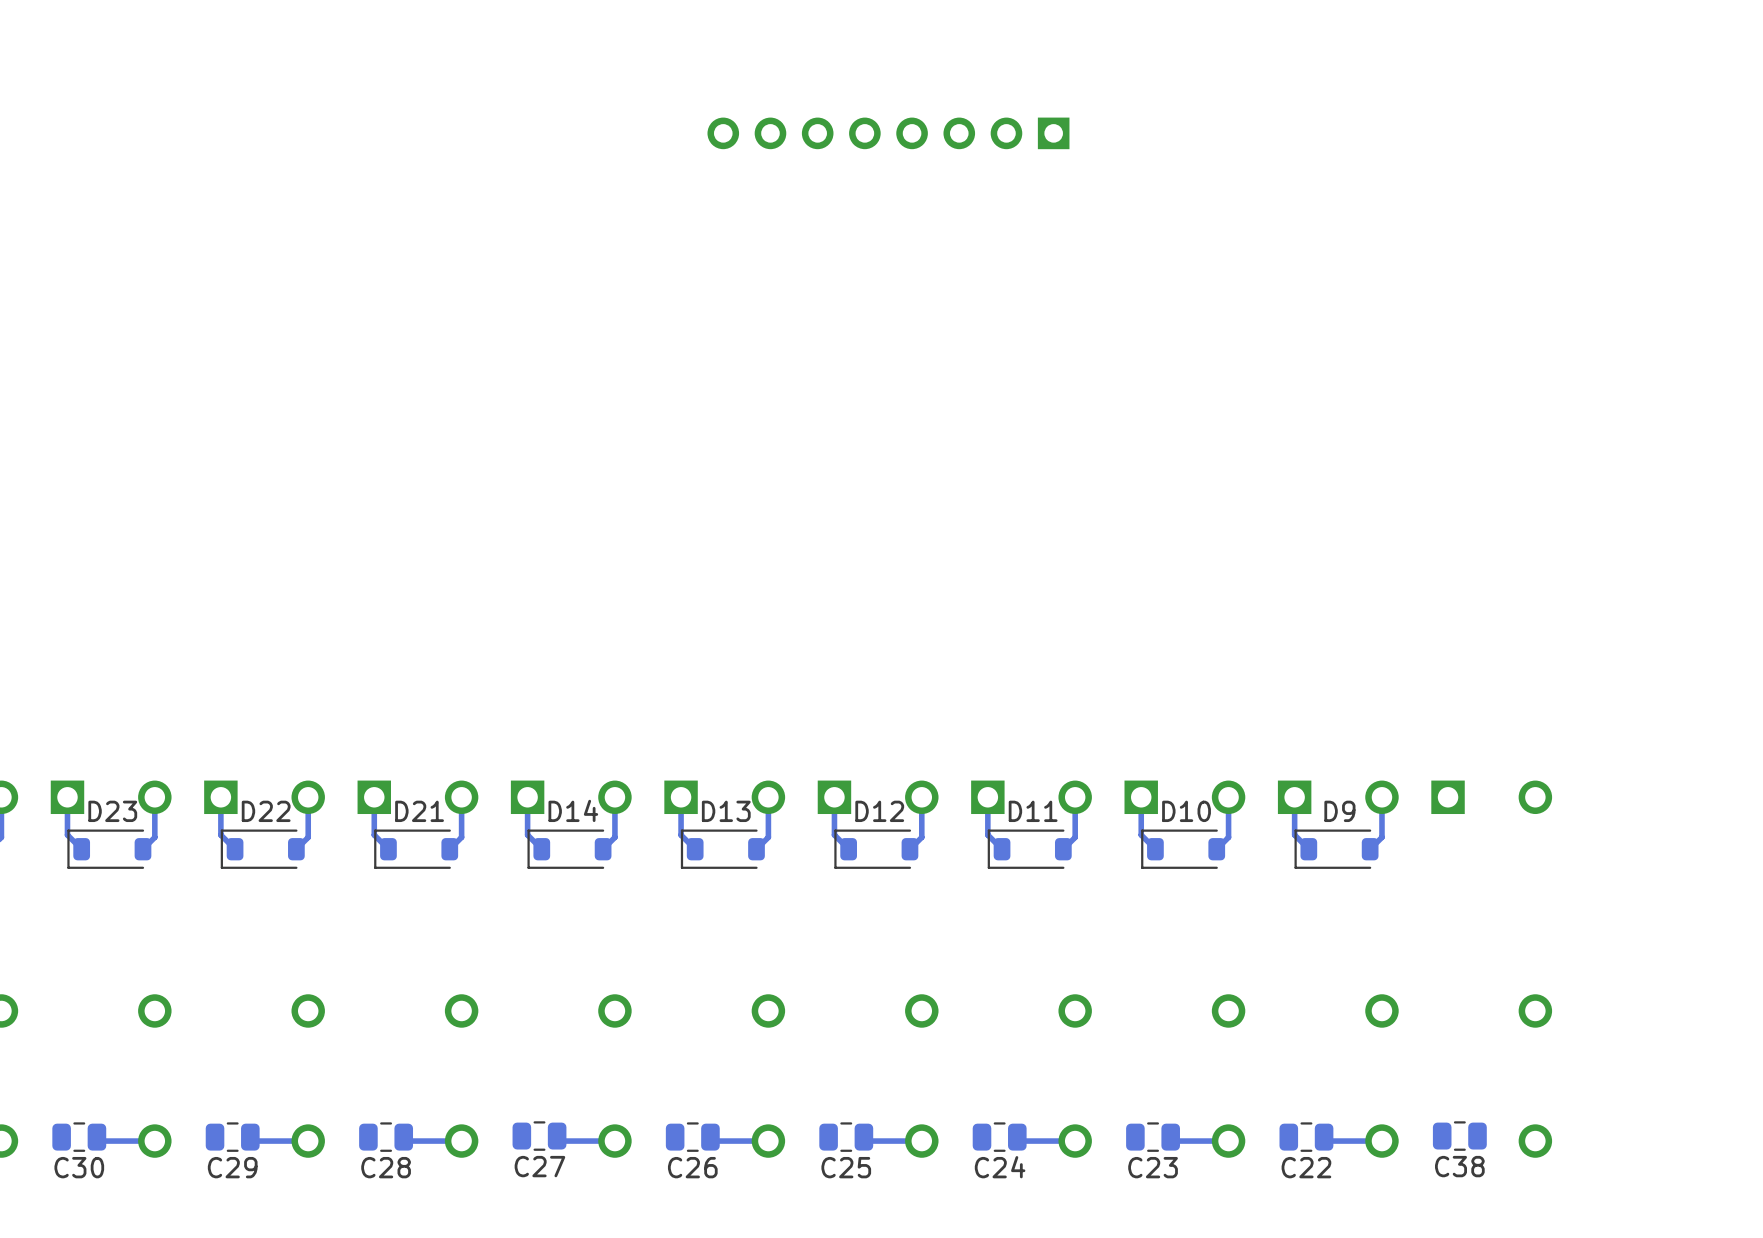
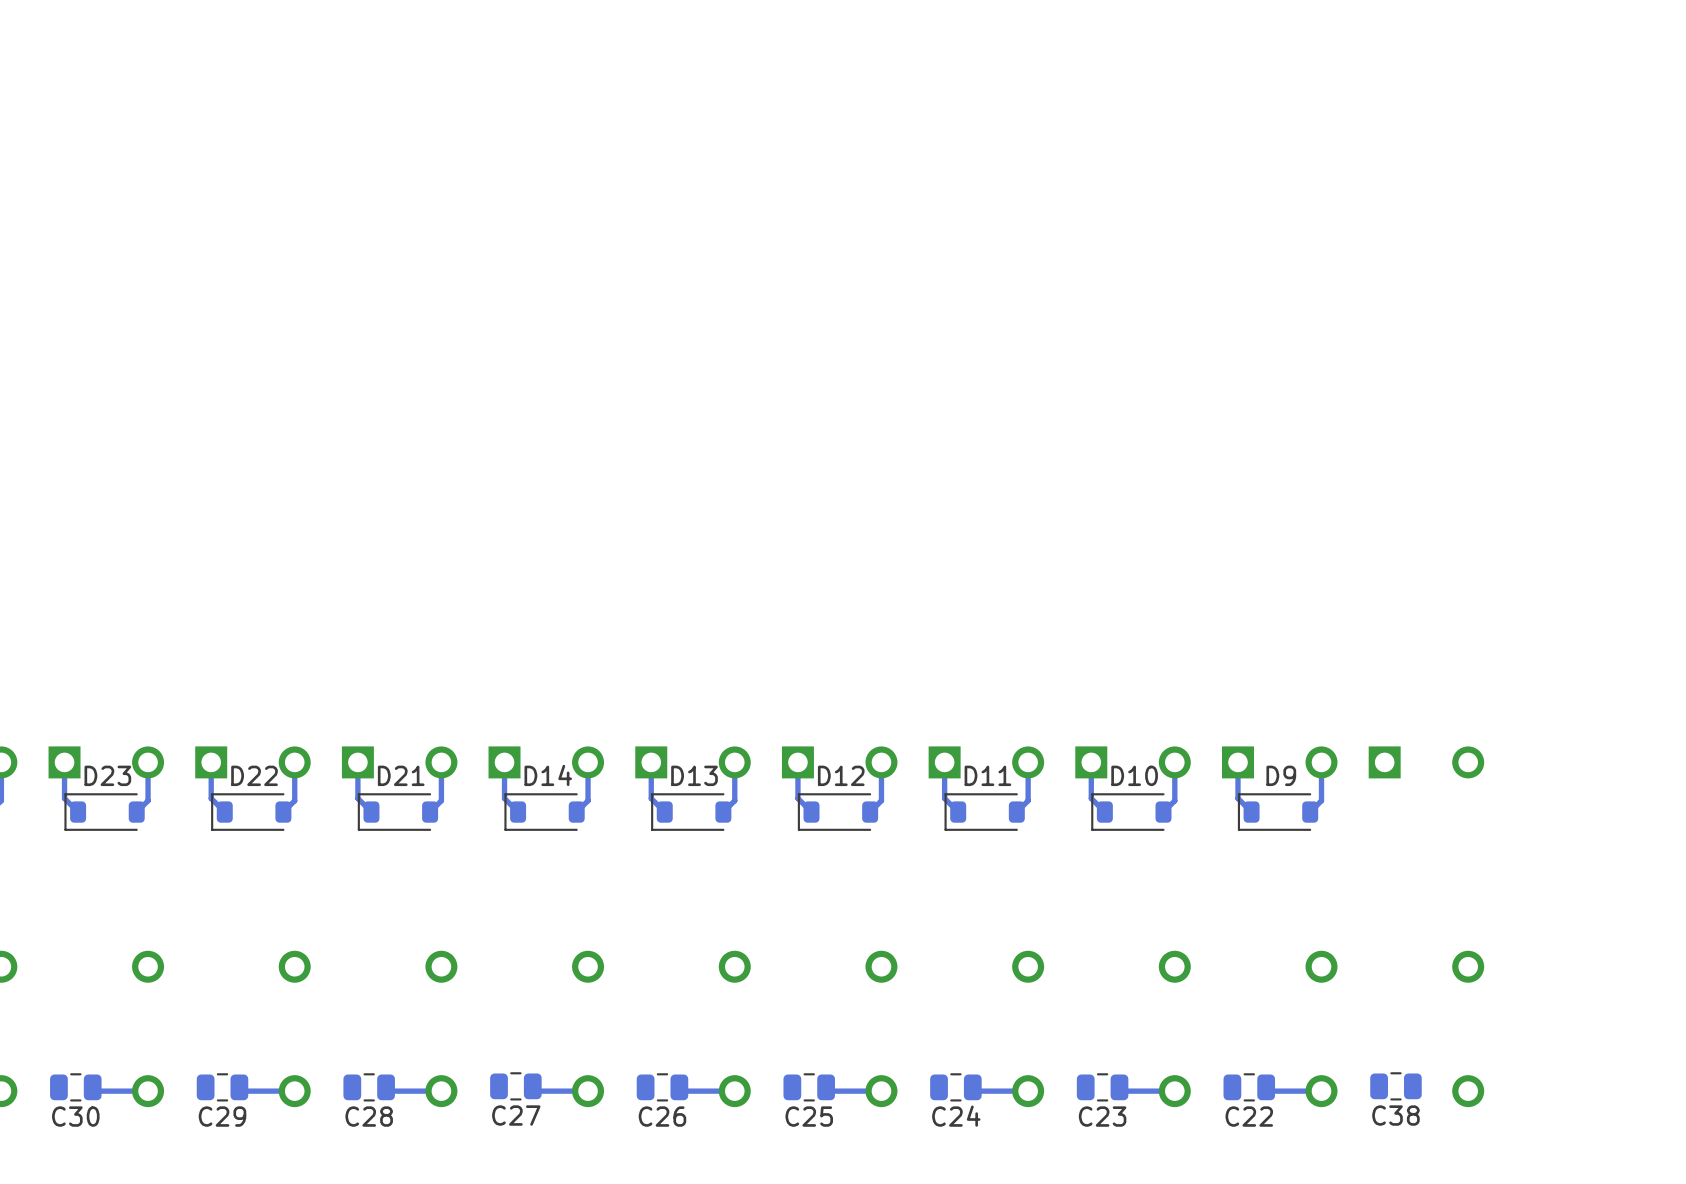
part: (888, 133) -> none

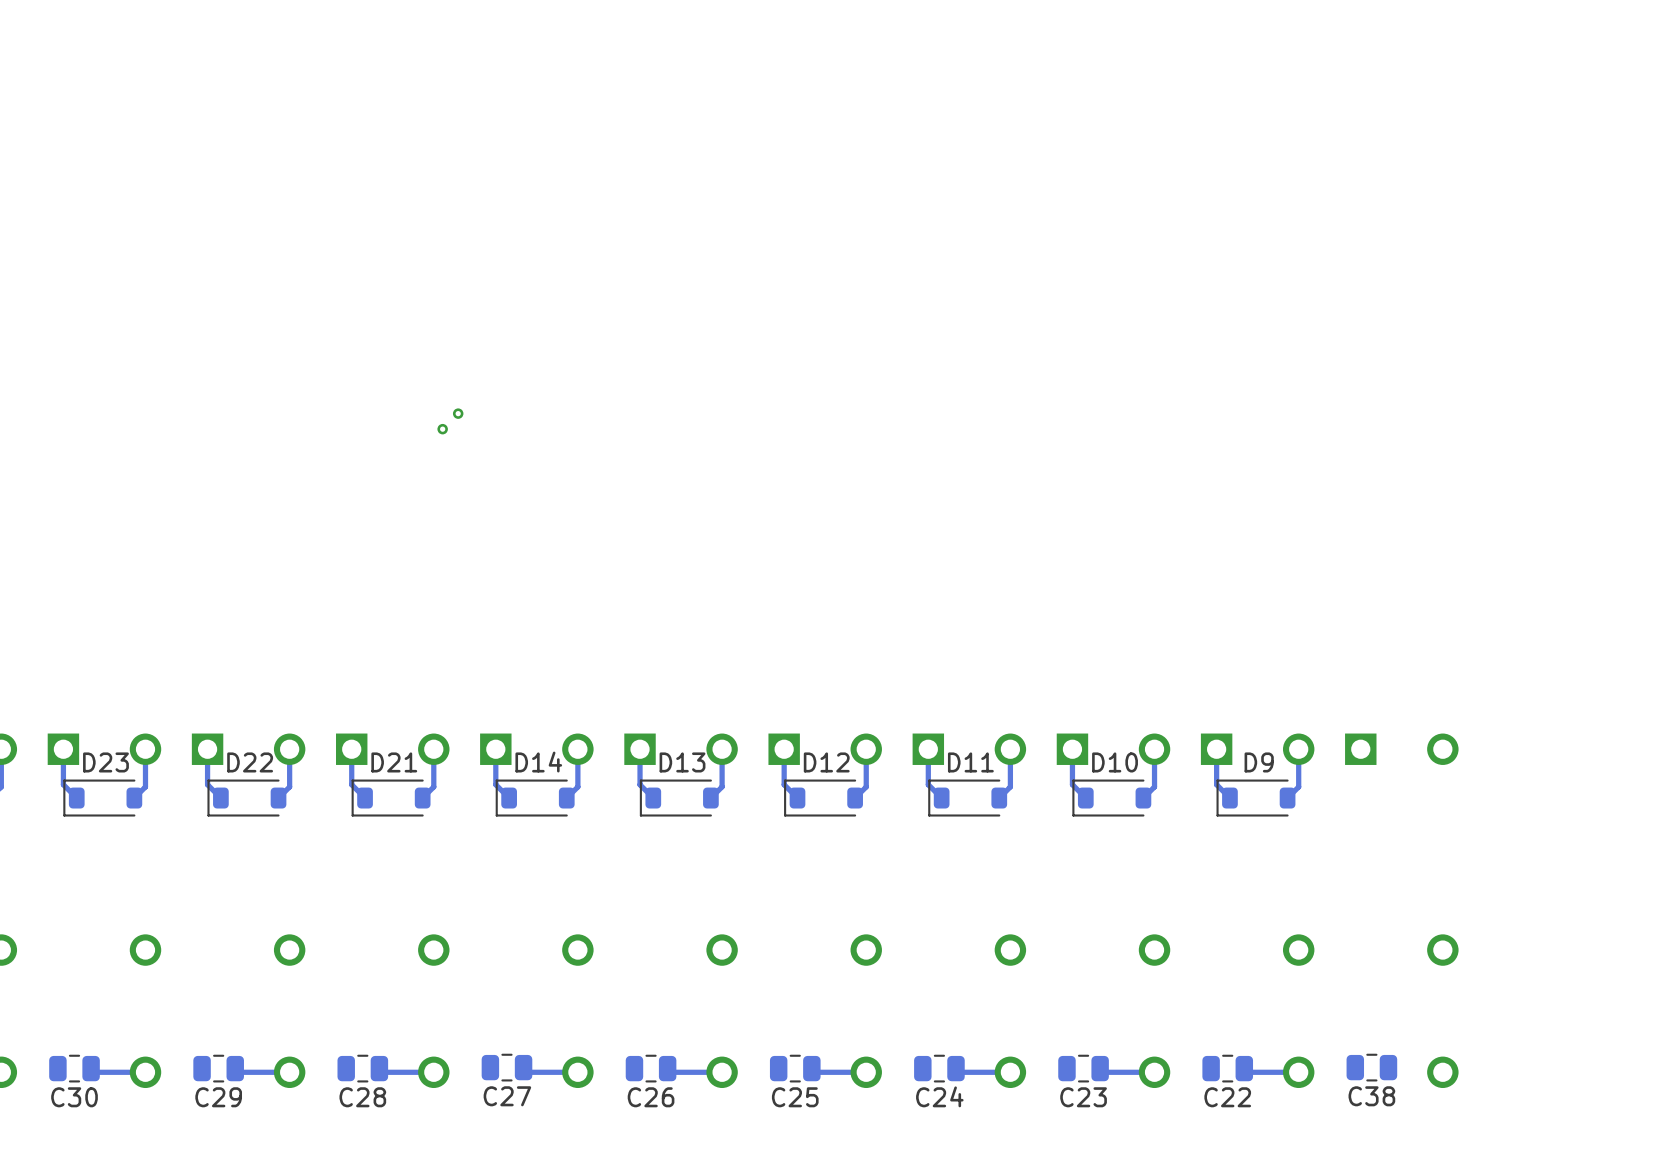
via: none -> (458, 413)
via: none -> (442, 429)

